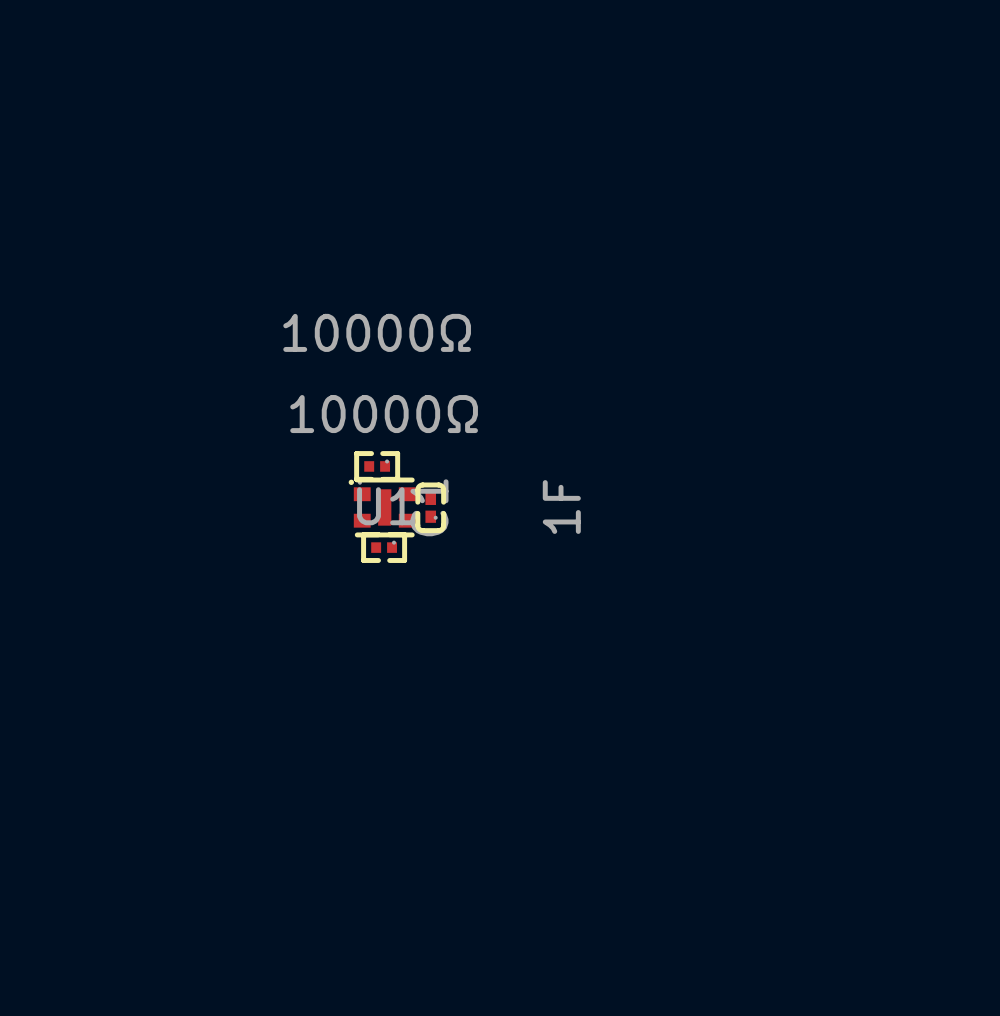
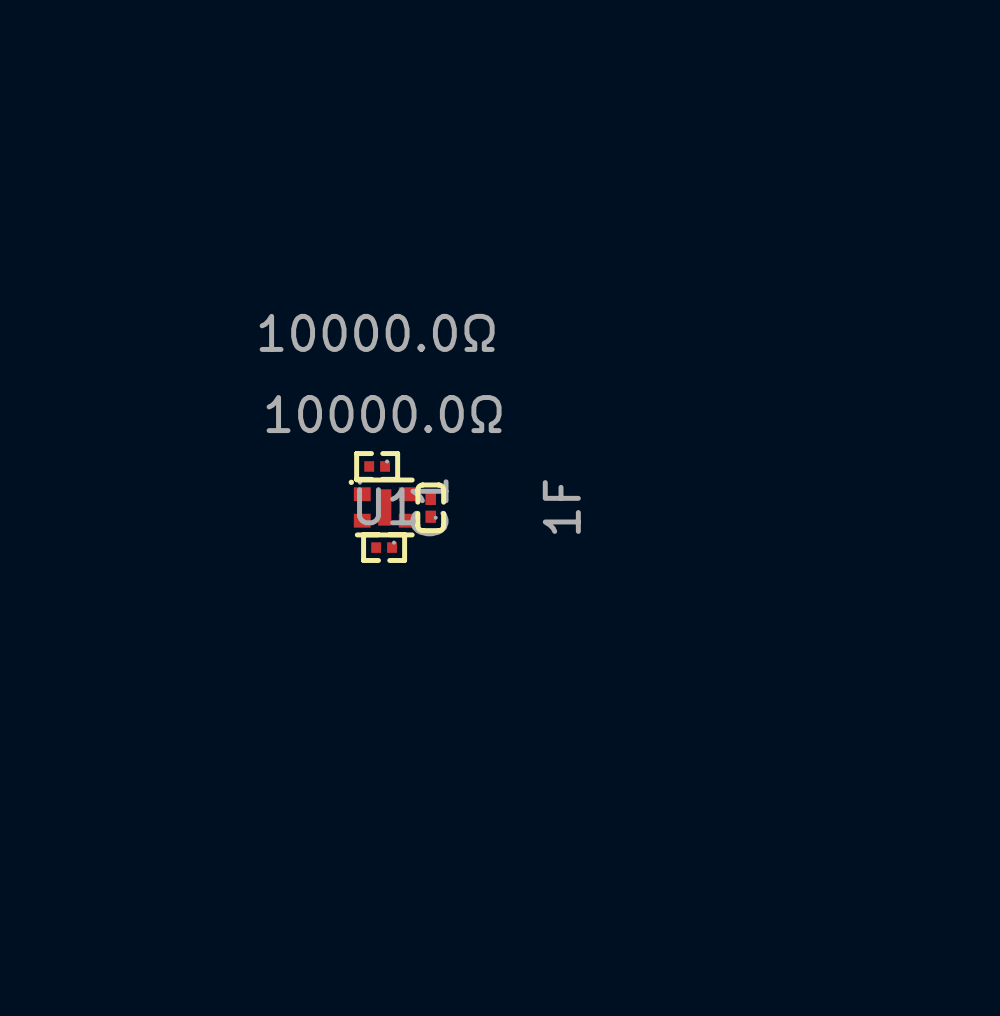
part value: 10000Ω (377, 332) -> 10000.0Ω (377, 332)
part value: 10000Ω (384, 414) -> 10000.0Ω (384, 414)

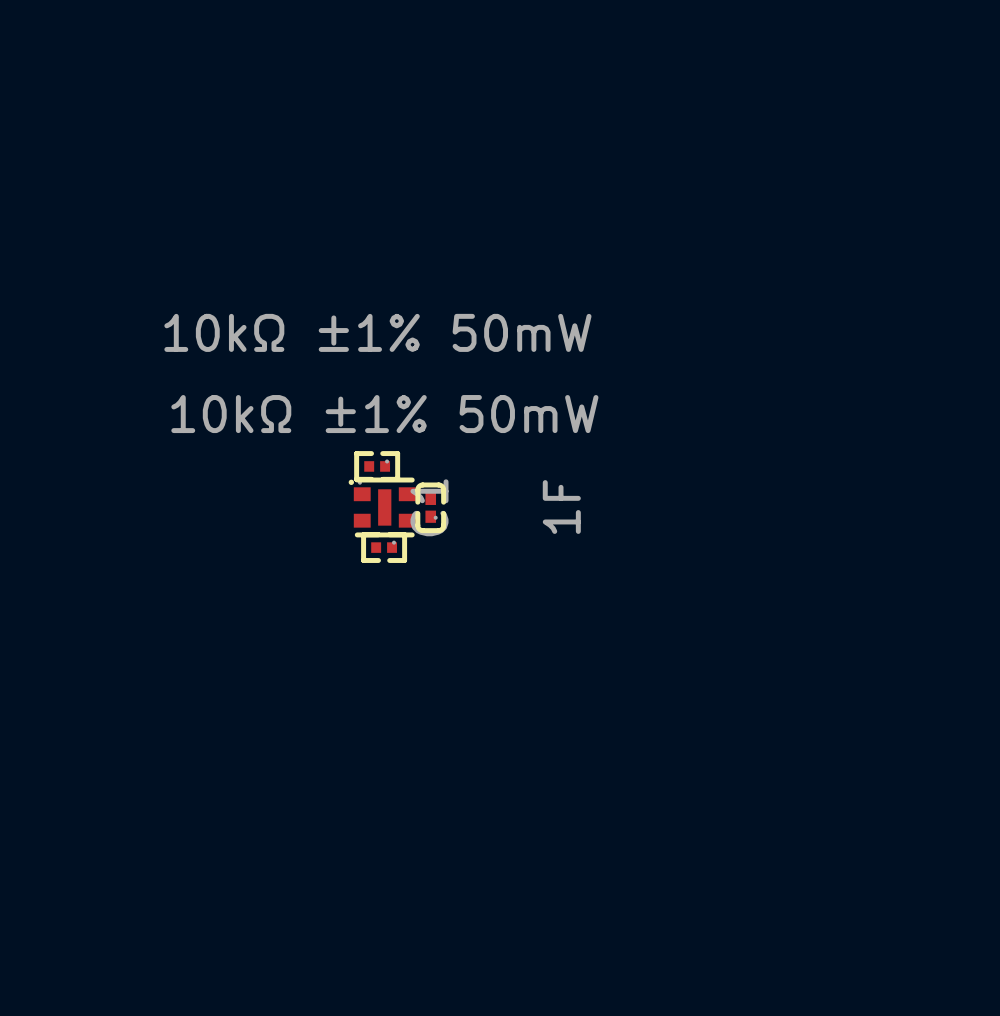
part value: 10000.0Ω (377, 332) -> 10kΩ ±1% 50mW (377, 332)
part value: 10000.0Ω (384, 414) -> 10kΩ ±1% 50mW (384, 414)
U1 name: U1 (385, 506) -> none

